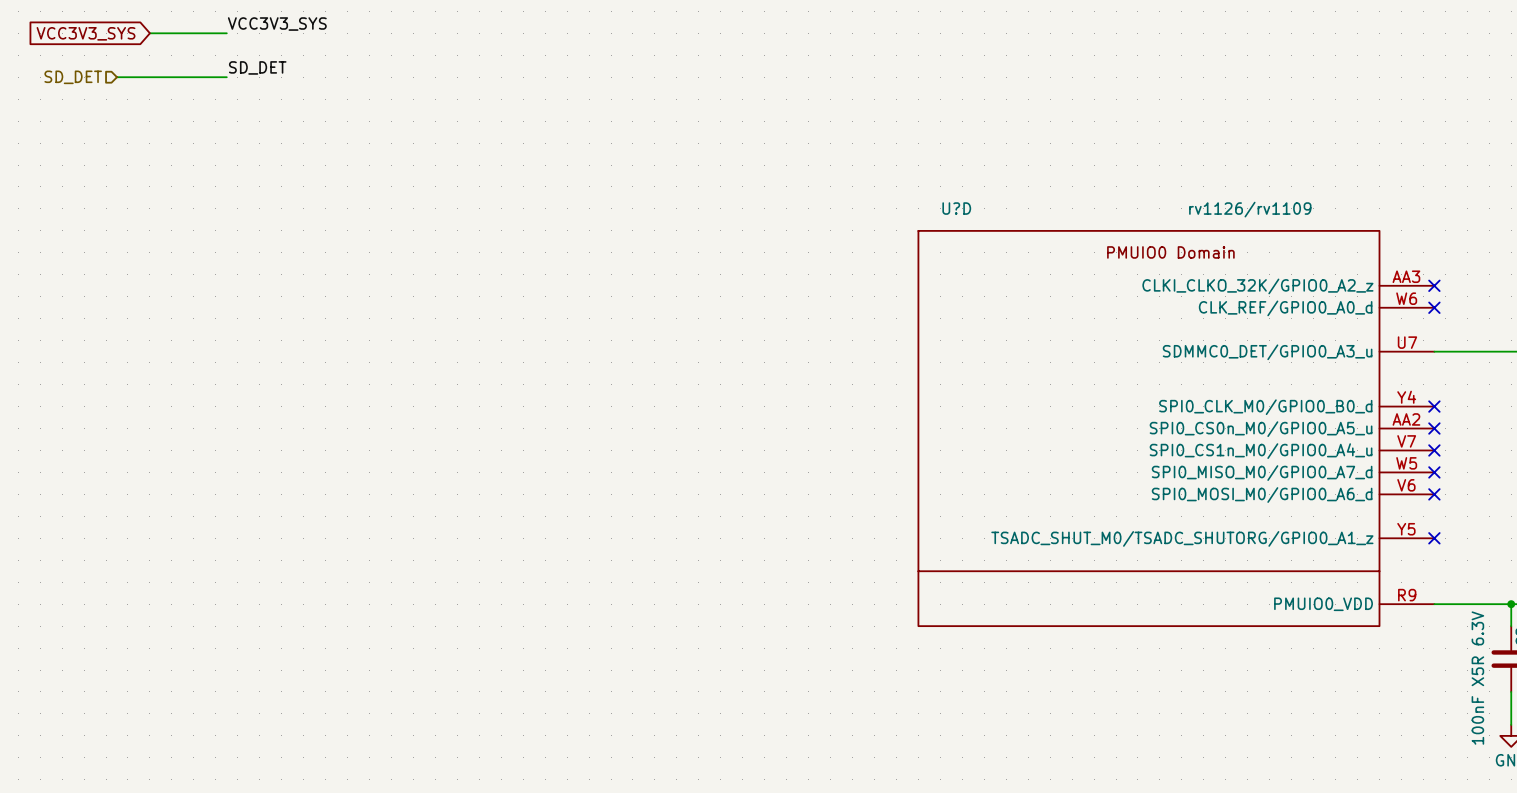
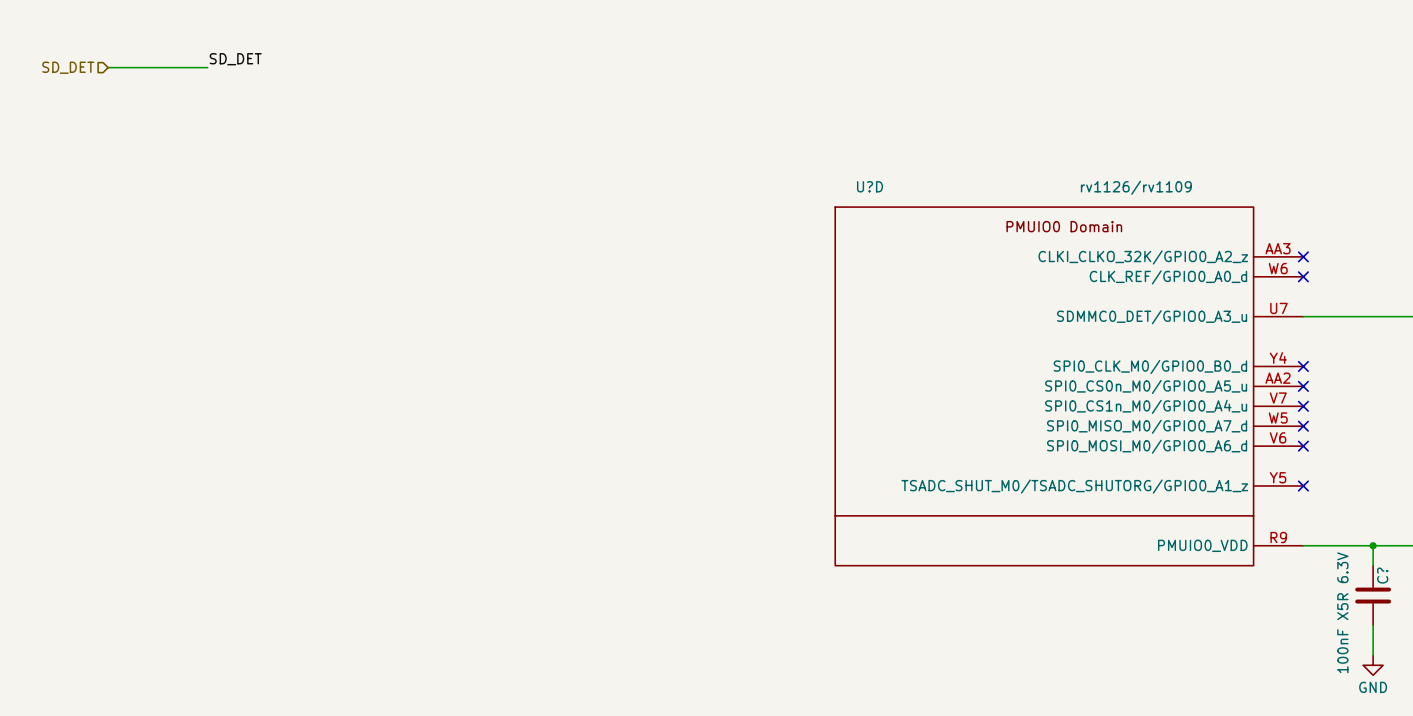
label: VCC3V3_SYS (277, 24) -> none
global label: VCC3V3_SYS (86, 33) -> none
wire: (149, 33) (226, 33) -> none

